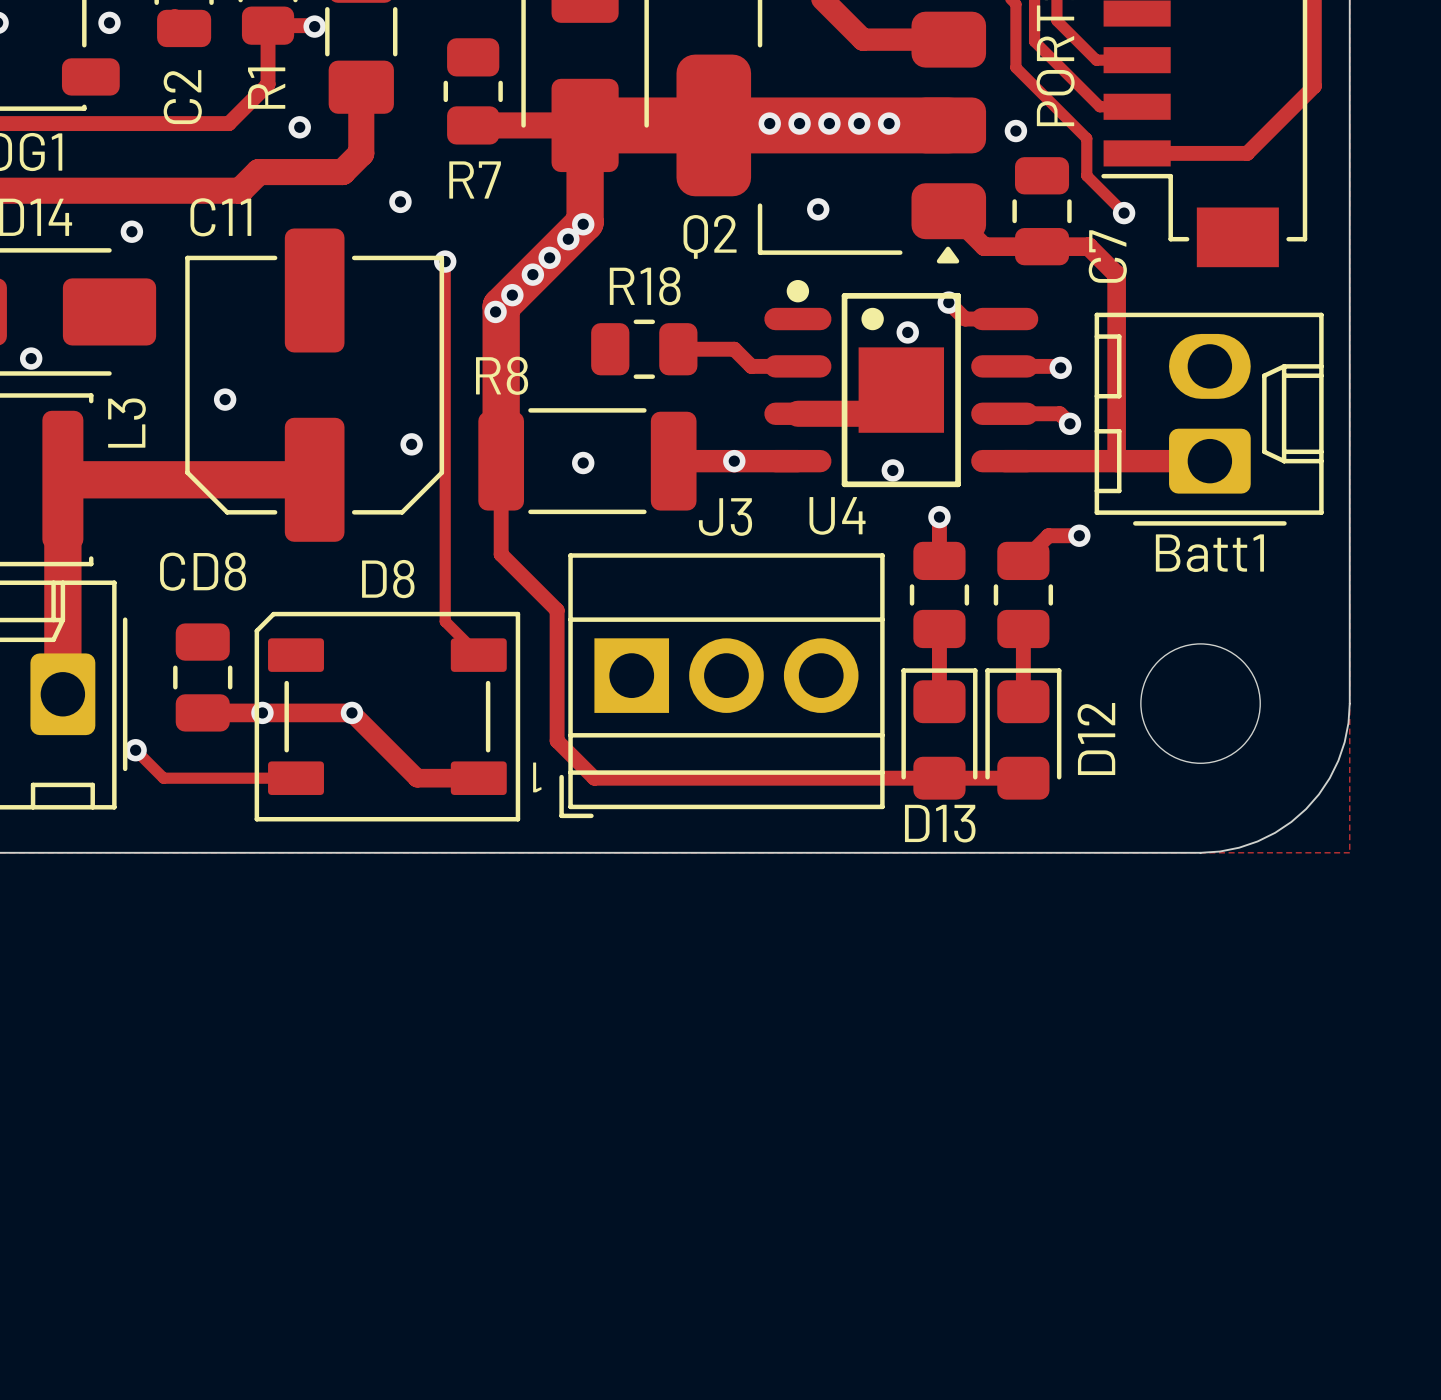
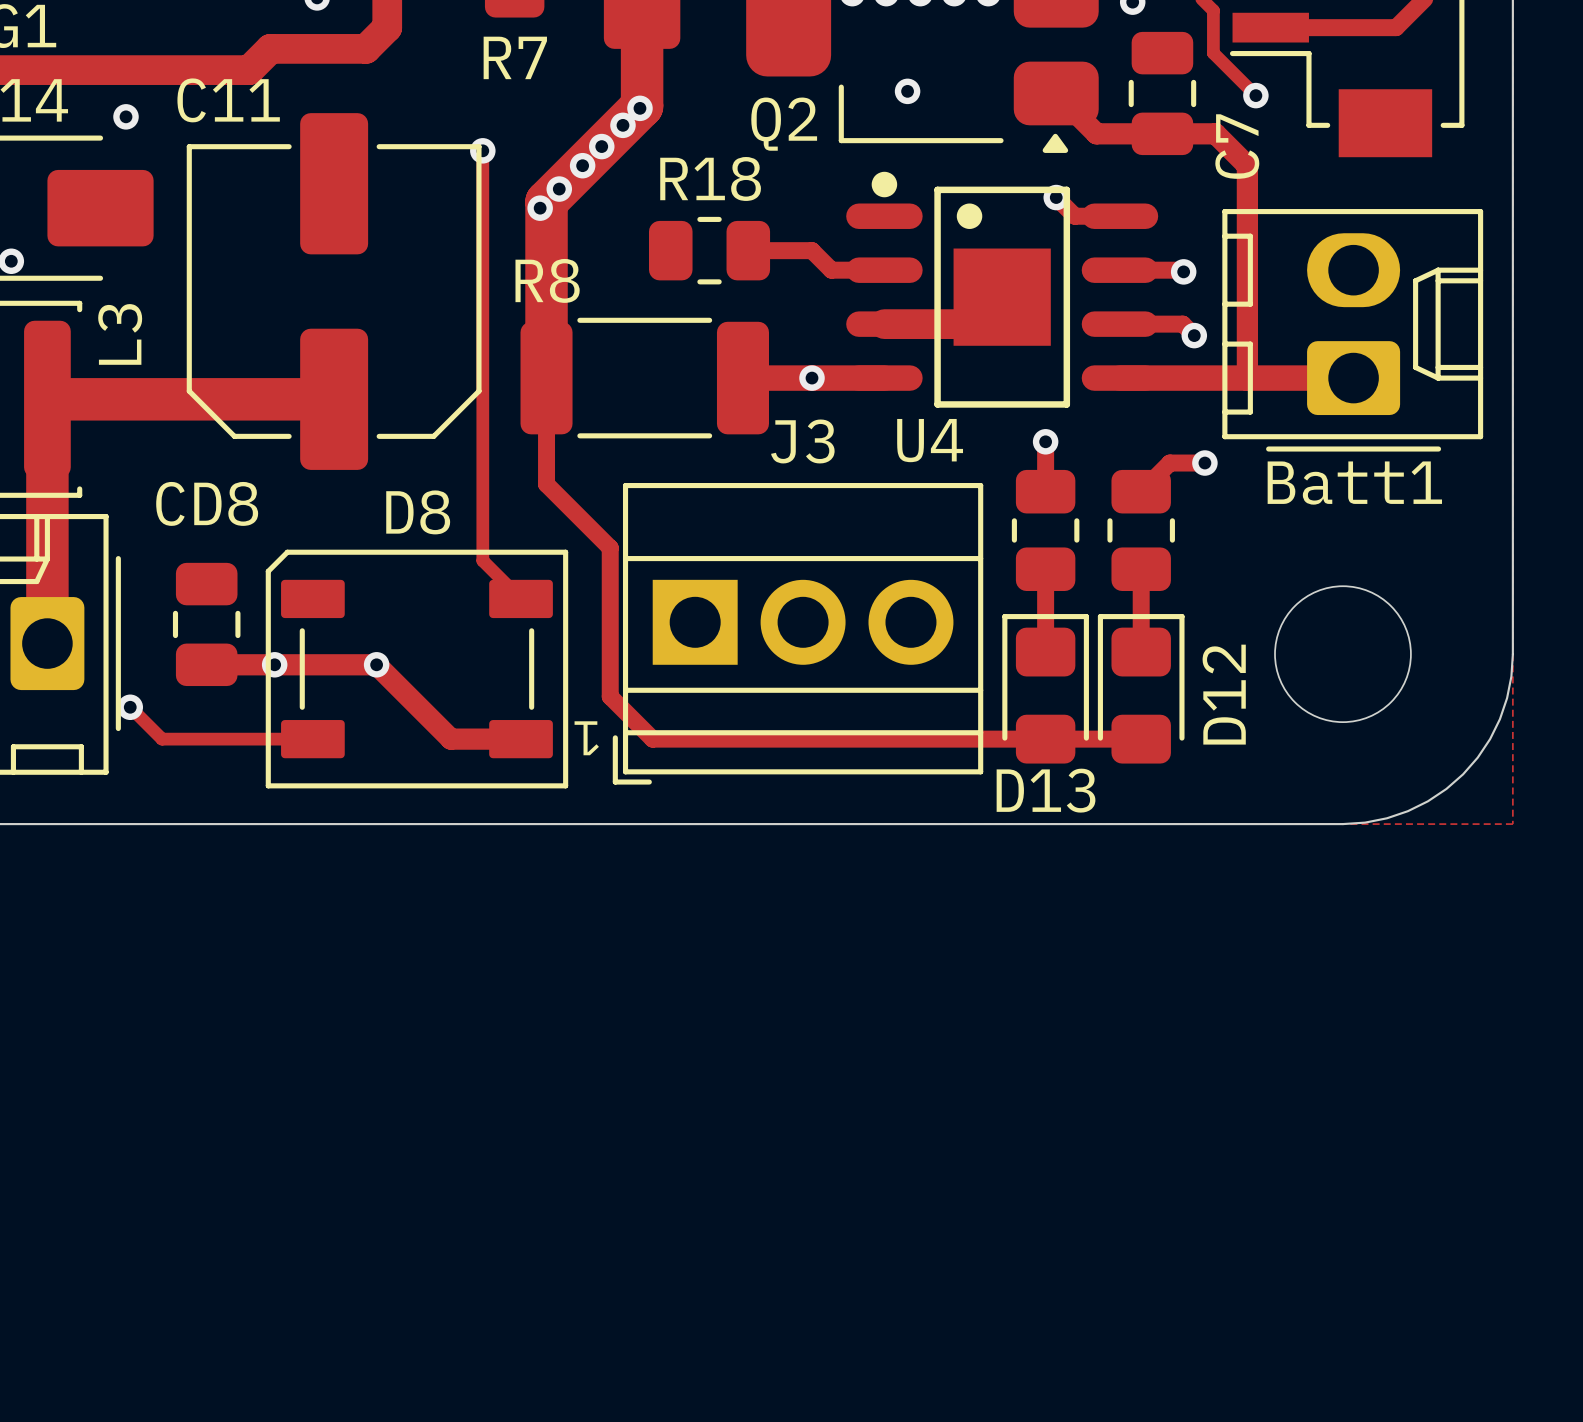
via: (400, 201) -> none
via: (907, 332) -> none
via: (225, 399) -> none
via: (411, 444) -> none
via: (583, 463) -> none
via: (892, 470) -> none

